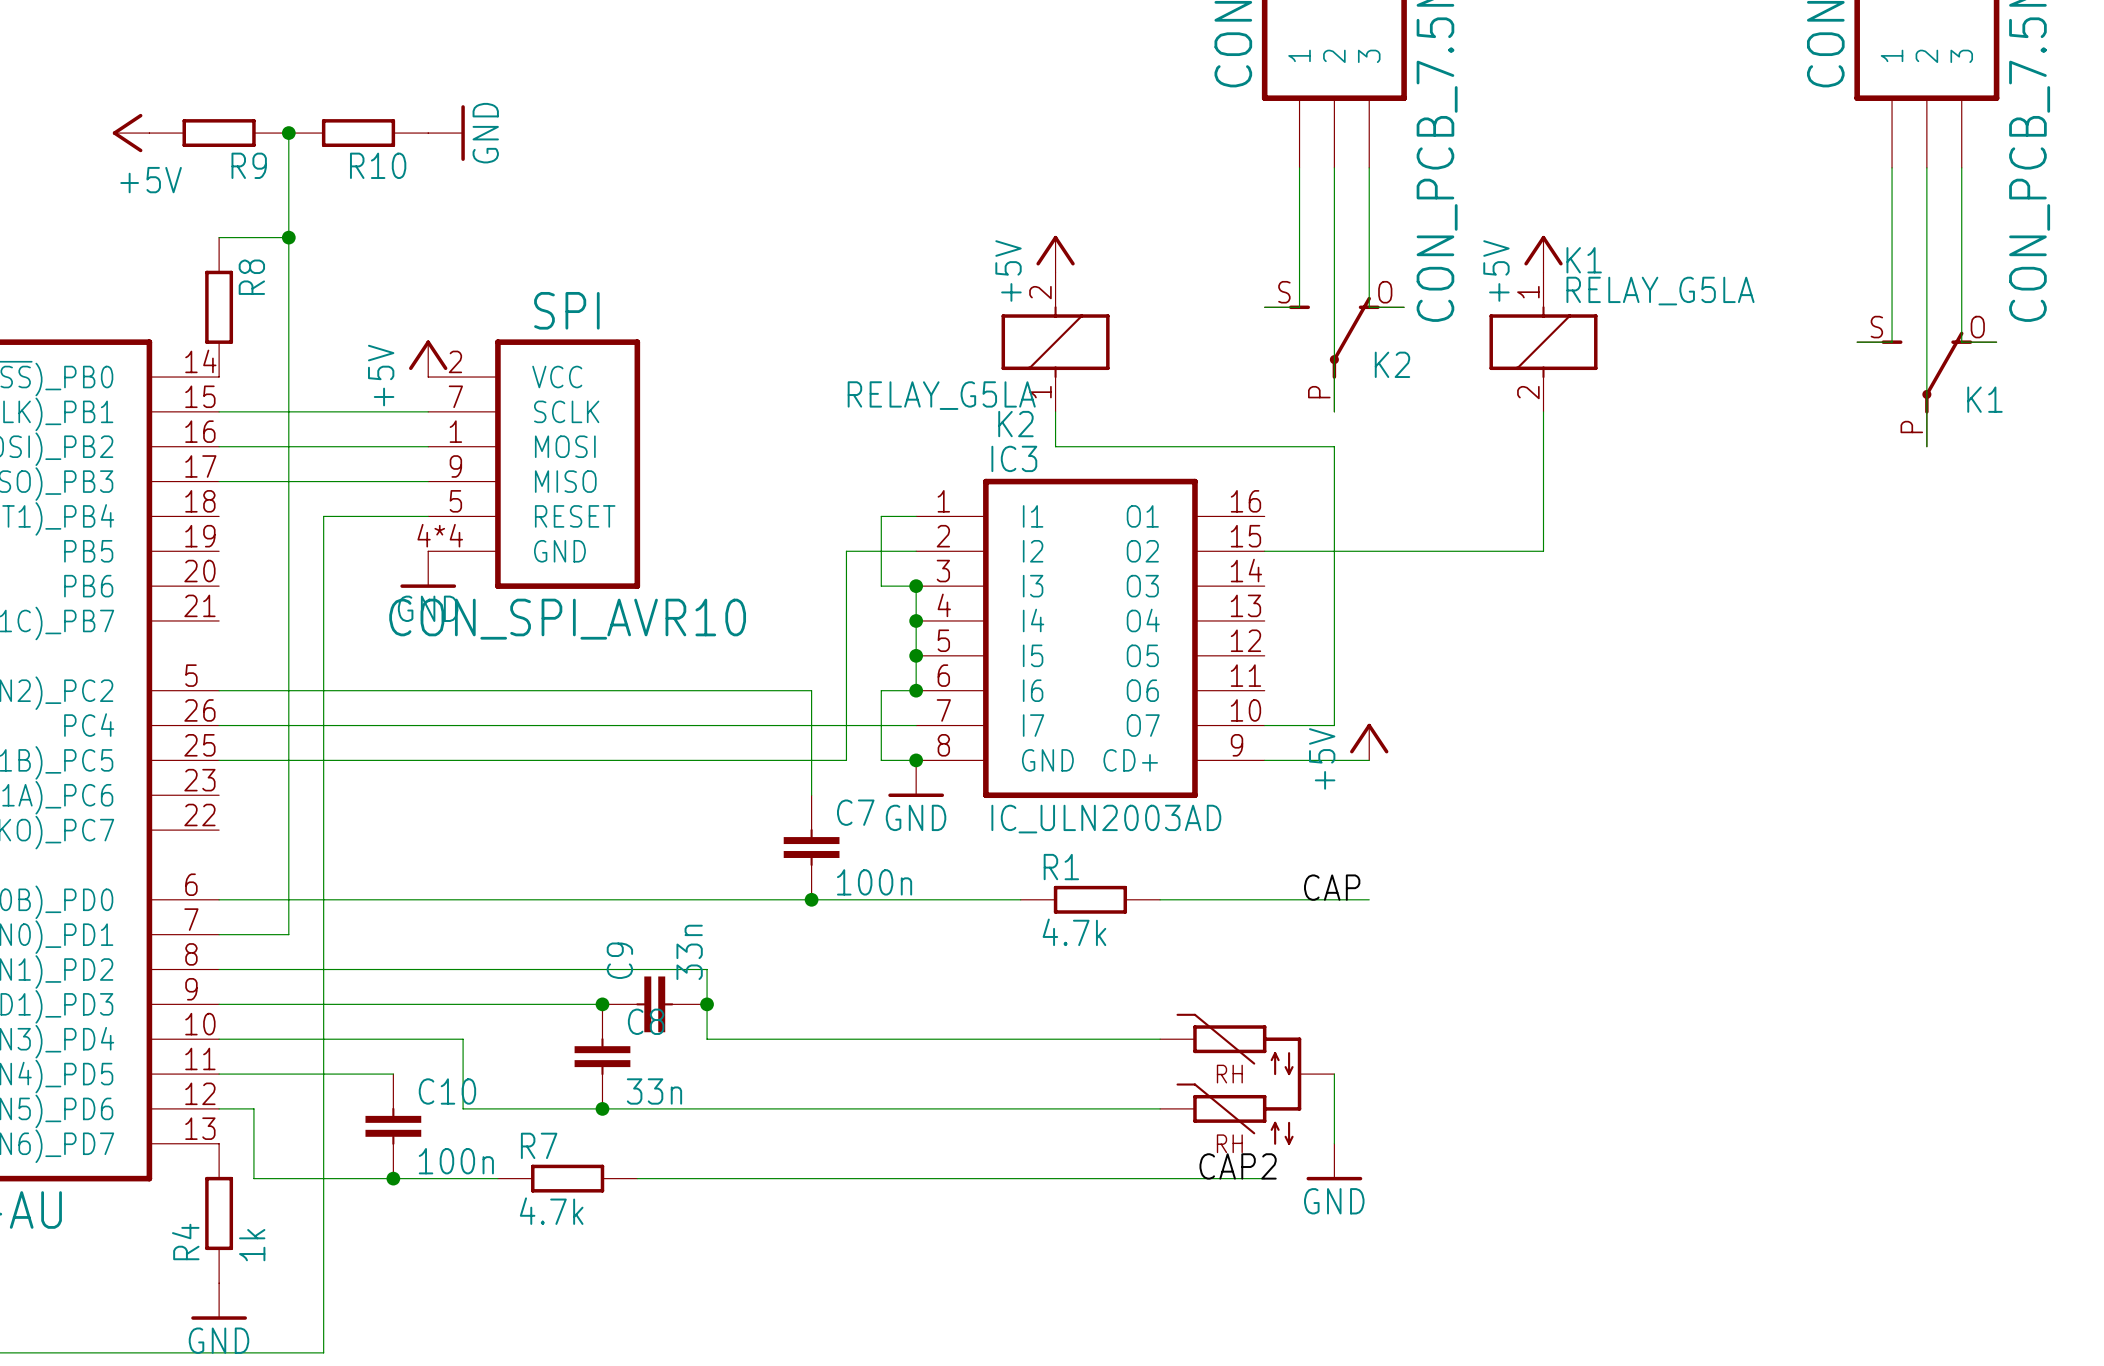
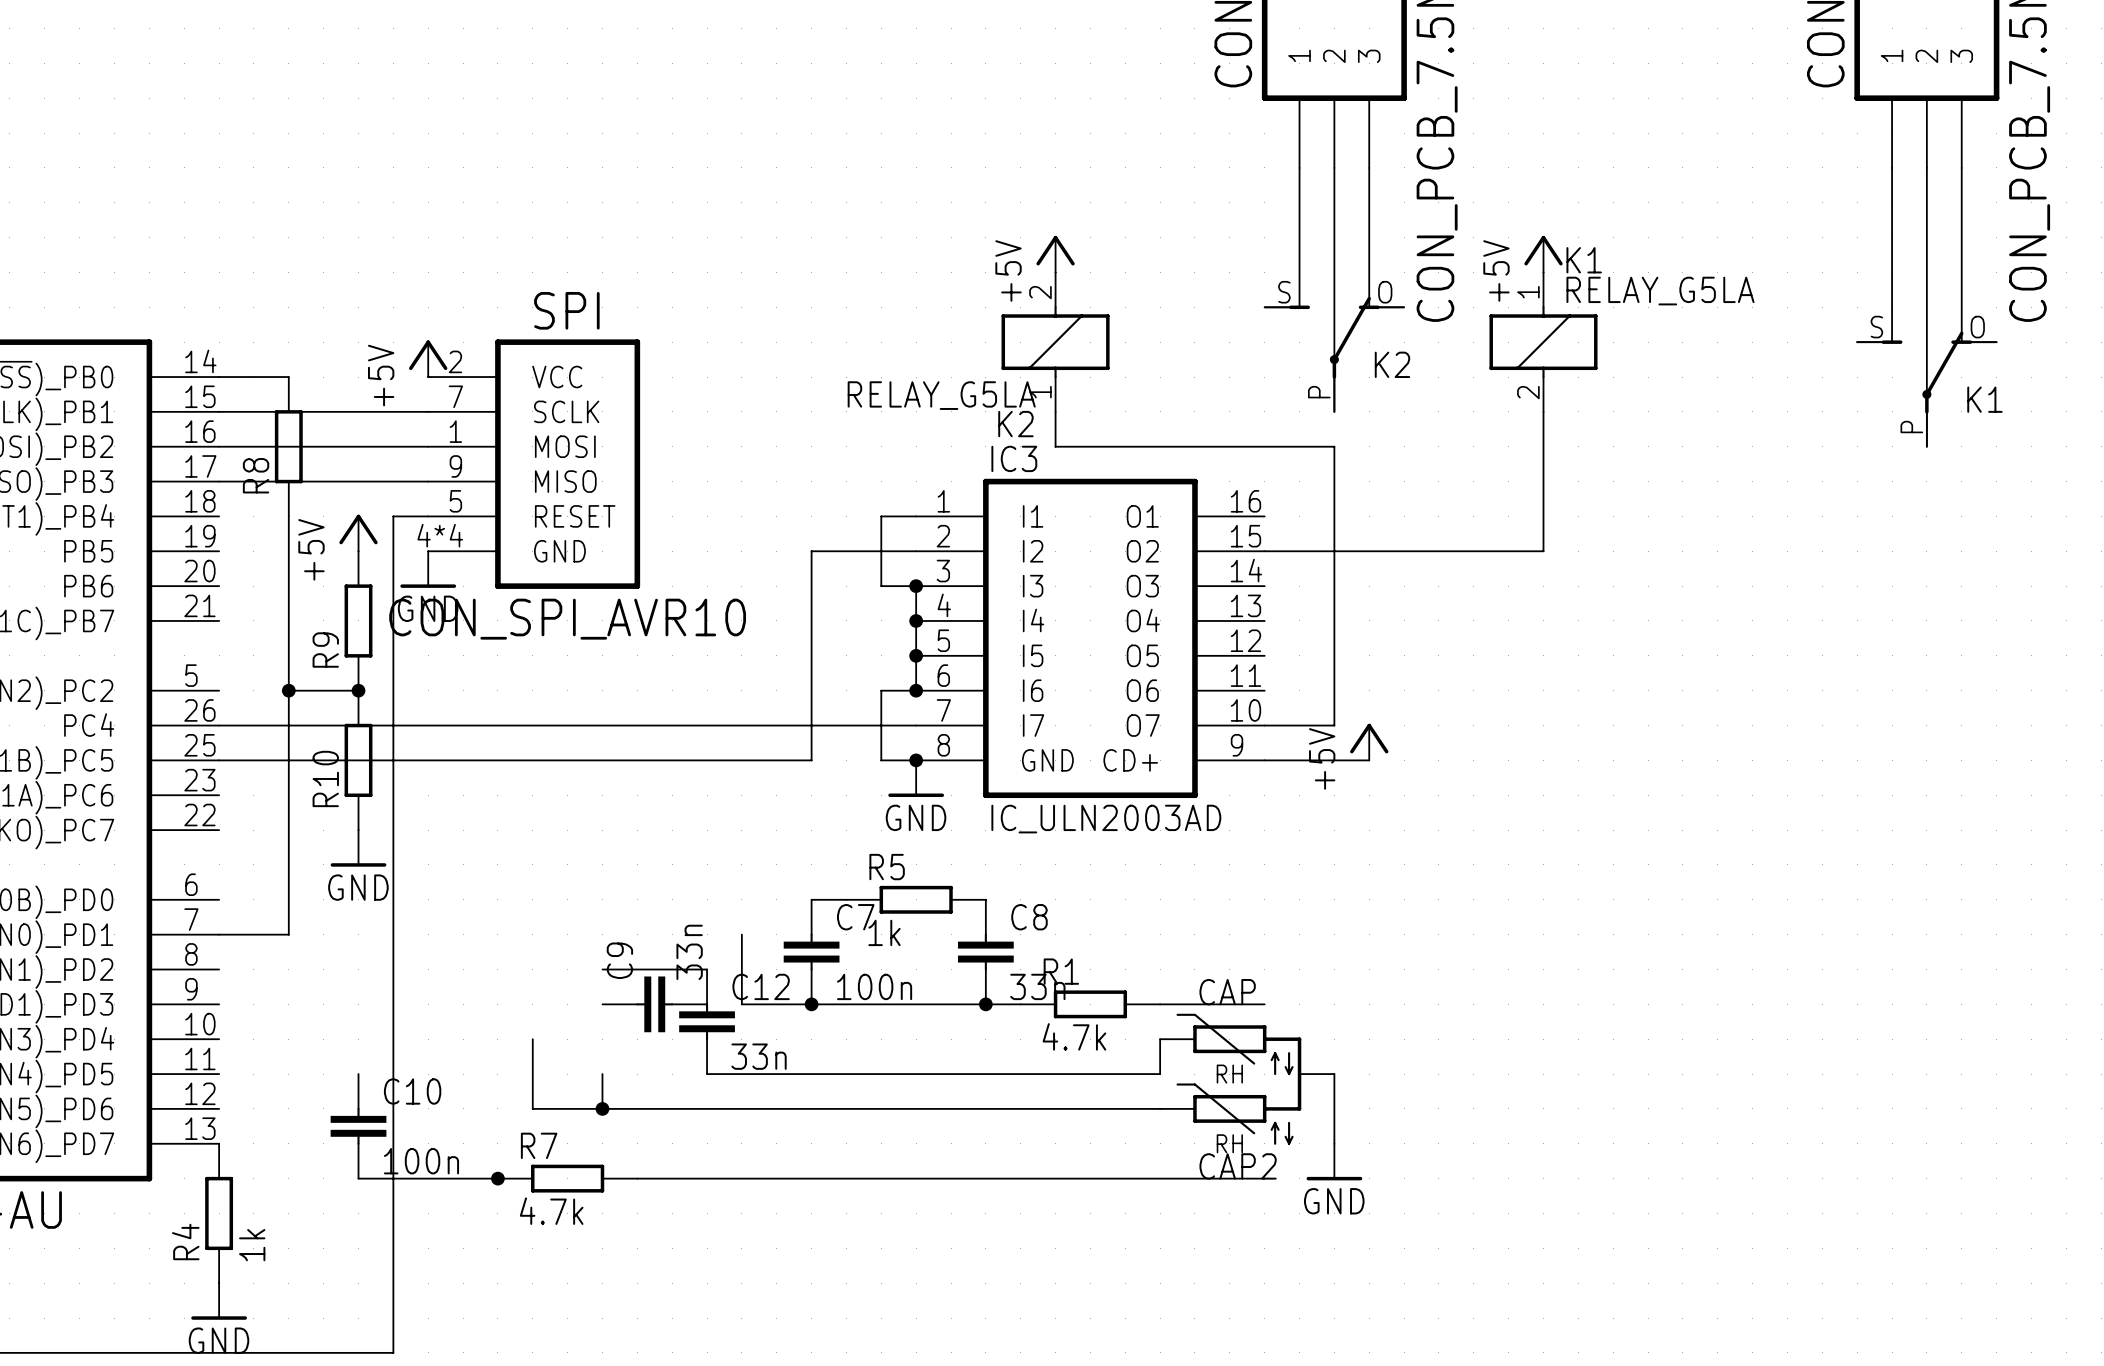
power symbol: +5V (131, 133) -> none
R9 rotation: 0° (219, 133) -> 90° clockwise (358, 620)
R9 position: (219, 133) -> (358, 620)
wire: (288, 133) (288, 516) -> none
junction: (288, 133) -> none
R10 rotation: 0° (358, 133) -> 90° clockwise (358, 760)
R10 position: (358, 133) -> (358, 760)
power symbol: GND (446, 133) -> none
wire: (219, 237) (288, 237) -> (219, 377) (288, 377)
junction: (288, 237) -> none
R8 name position: R8 (251, 277) -> R8 (256, 475)
R8 position: (219, 307) -> (288, 446)
wire: (393, 516) (323, 516) (323, 1352) -> (393, 516) (393, 1352) (323, 1352)
power symbol: none -> +5V (358, 532)
wire: (846, 551) (846, 760) (811, 760) (811, 795) -> (846, 551) (811, 551) (811, 690)
wire: (219, 690) (288, 690) -> none
junction: none -> (288, 690)
wire: (358, 690) (811, 690) -> none
junction: none -> (358, 690)
C7 position: (811, 847) -> (811, 952)
power symbol: none -> GND (358, 848)
label position: CAP (1332, 887) -> CAP (1227, 992)
wire: (219, 899) (811, 899) -> none
junction: (811, 899) -> none
wire: (846, 899) (1020, 899) -> none
R5: none -> 1k (916, 899)
R1 position: (1090, 899) -> (1090, 1004)
wire: (1160, 899) (1369, 899) -> none
wire: none -> (741, 934) (741, 1004) (1020, 1004)
wire: (219, 969) (602, 969) -> none
wire: (707, 969) (707, 1039) (1160, 1039) -> (707, 1074) (1160, 1074) (1160, 1039)
wire: (219, 1004) (602, 1004) -> none
junction: (602, 1004) -> none
junction: (707, 1004) -> none
junction: none -> (811, 1004)
junction: none -> (985, 1004)
wire: none -> (1160, 1004) (1264, 1004)
C12: none -> 33n (707, 1021)
wire: (219, 1039) (463, 1039) (463, 1108) (532, 1108) -> (532, 1039) (532, 1108)
C8 position: (602, 1056) -> (985, 952)
wire: (219, 1074) (393, 1074) -> none
wire: (219, 1108) (253, 1108) (253, 1178) (358, 1178) -> none
C10 position: (393, 1126) -> (358, 1126)
junction: (393, 1178) -> none
junction: none -> (497, 1178)

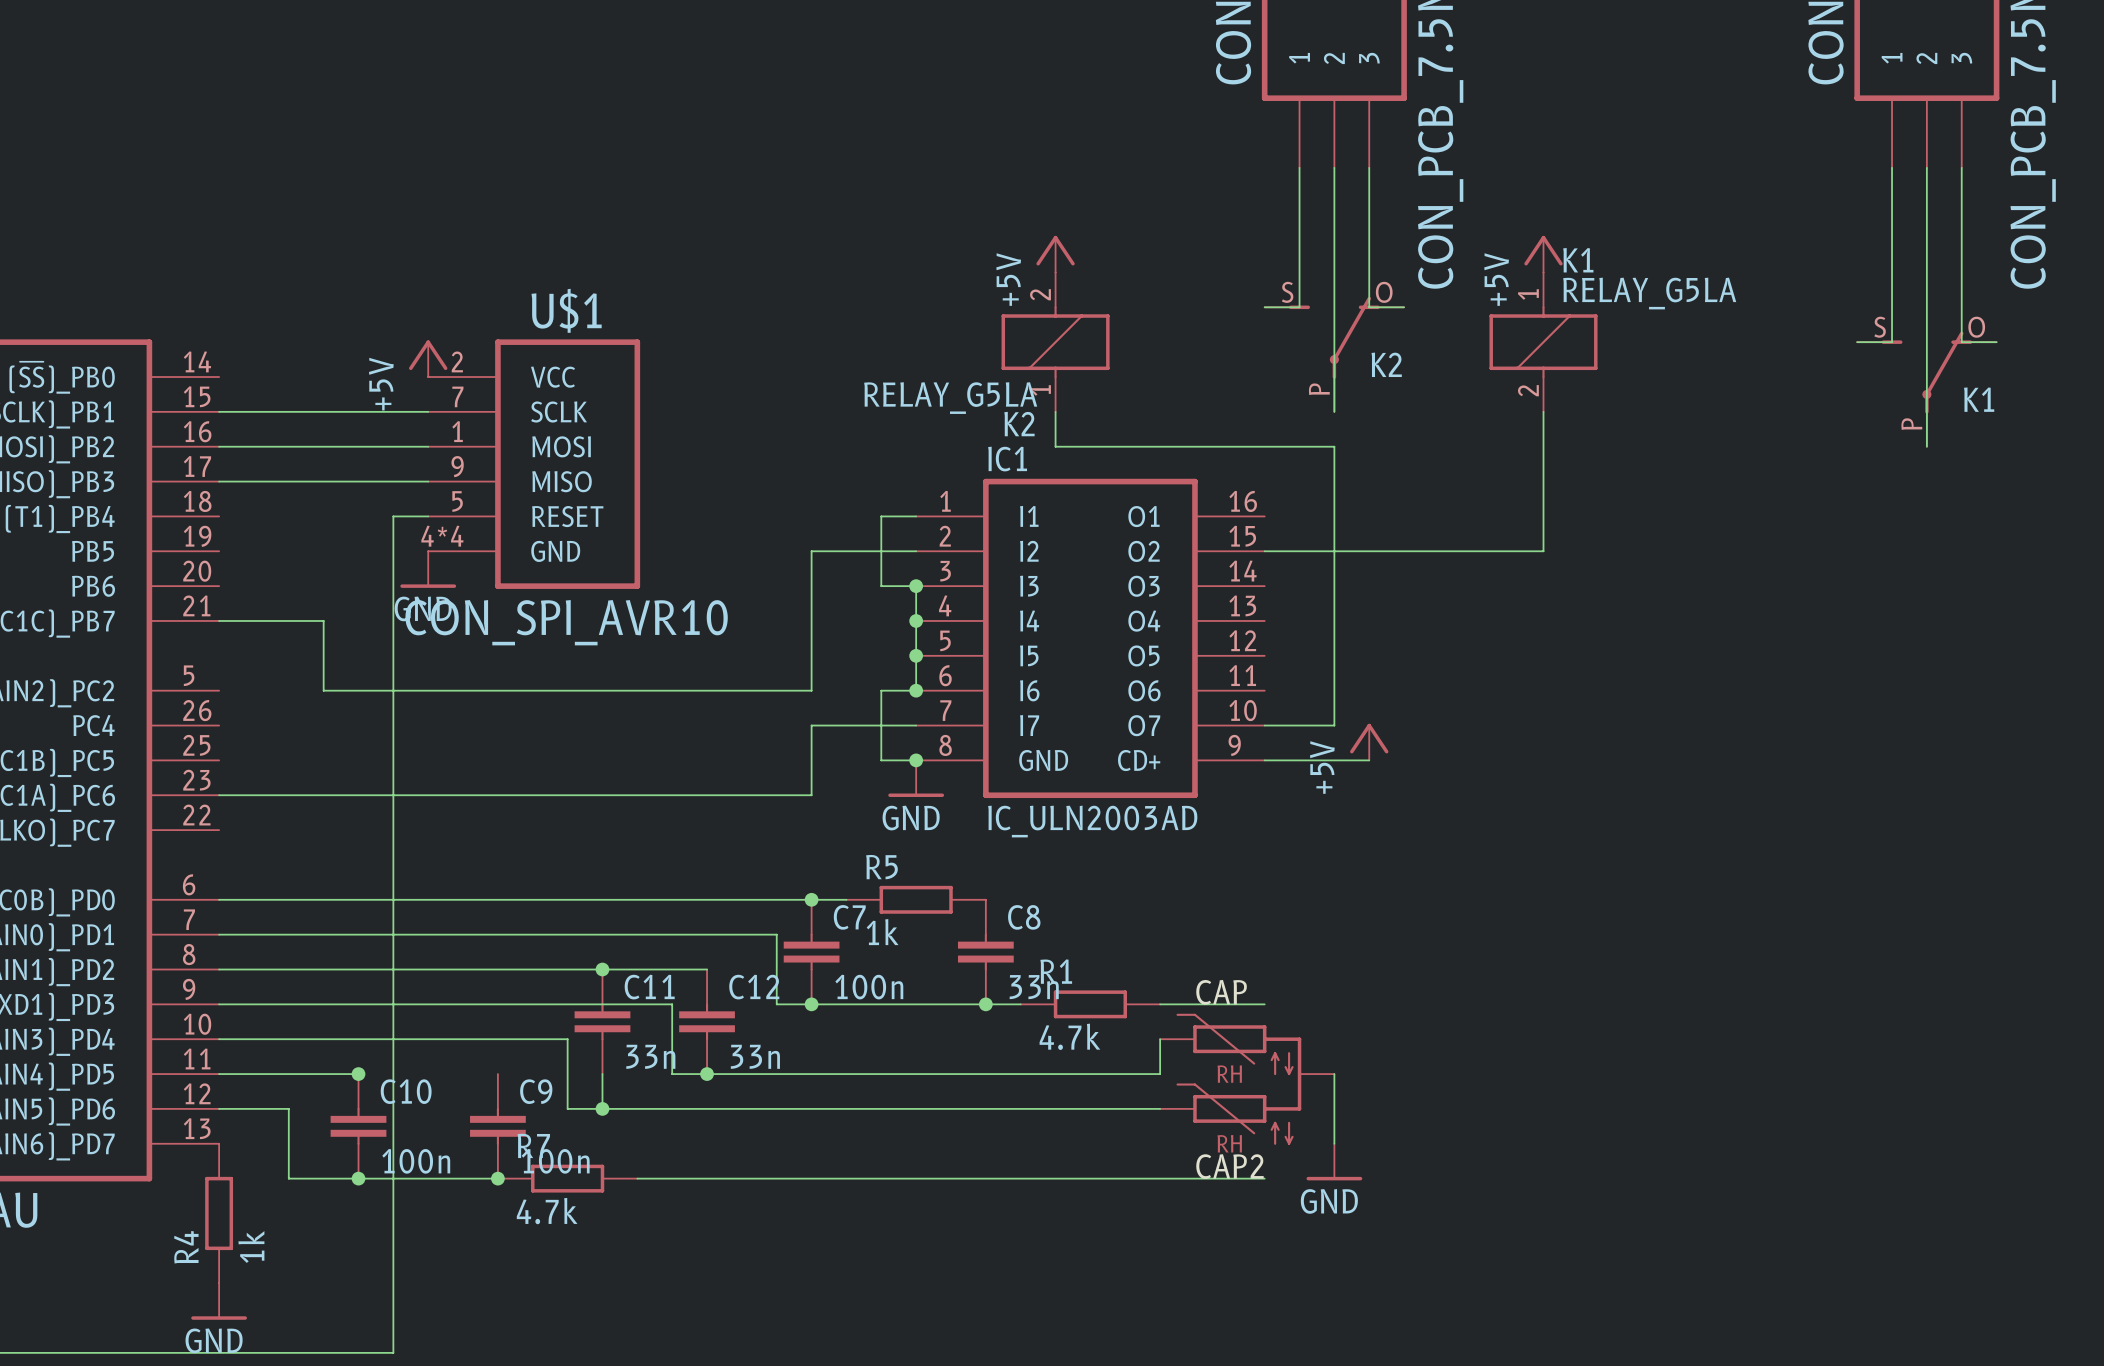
SPI name: SPI (566, 310) -> U$1 (566, 310)
wire: (219, 377) (288, 377) -> none
R8: (288, 446) -> none
IC3 name: IC3 (1014, 458) -> IC1 (1007, 459)
wire: (288, 516) (288, 934) -> none
power symbol: +5V (358, 532) -> none
R9: (358, 620) -> none
wire: (288, 690) (323, 690) -> (219, 620) (323, 620) (323, 690)
junction: (288, 690) -> none
junction: (358, 690) -> none
wire: (811, 690) (811, 725) (219, 725) -> (811, 690) (358, 690)
wire: (219, 760) (811, 760) -> (219, 795) (811, 795) (811, 760)
R10: (358, 760) -> none
power symbol: GND (358, 848) -> none
wire: none -> (219, 899) (811, 899)
junction: none -> (811, 899)
wire: (741, 934) (741, 1004) (776, 1004) -> (288, 934) (776, 934) (776, 1004)
C9 value: 33n (689, 952) -> 100n (555, 1161)
wire: none -> (219, 969) (602, 969)
junction: none -> (602, 969)
wire: none -> (219, 1004) (672, 1004) (672, 1074) (707, 1074)
C9 rotation: 0° (654, 1004) -> 90° clockwise (497, 1126)
C9 position: (654, 1004) -> (497, 1126)
C11: none -> 33n (602, 1021)
wire: (532, 1039) (532, 1108) (567, 1108) -> (219, 1039) (567, 1039) (567, 1108)
wire: none -> (219, 1074) (358, 1074)
junction: none -> (358, 1074)
junction: none -> (707, 1074)
wire: none -> (219, 1108) (288, 1108) (288, 1178) (358, 1178)
junction: none -> (358, 1178)

